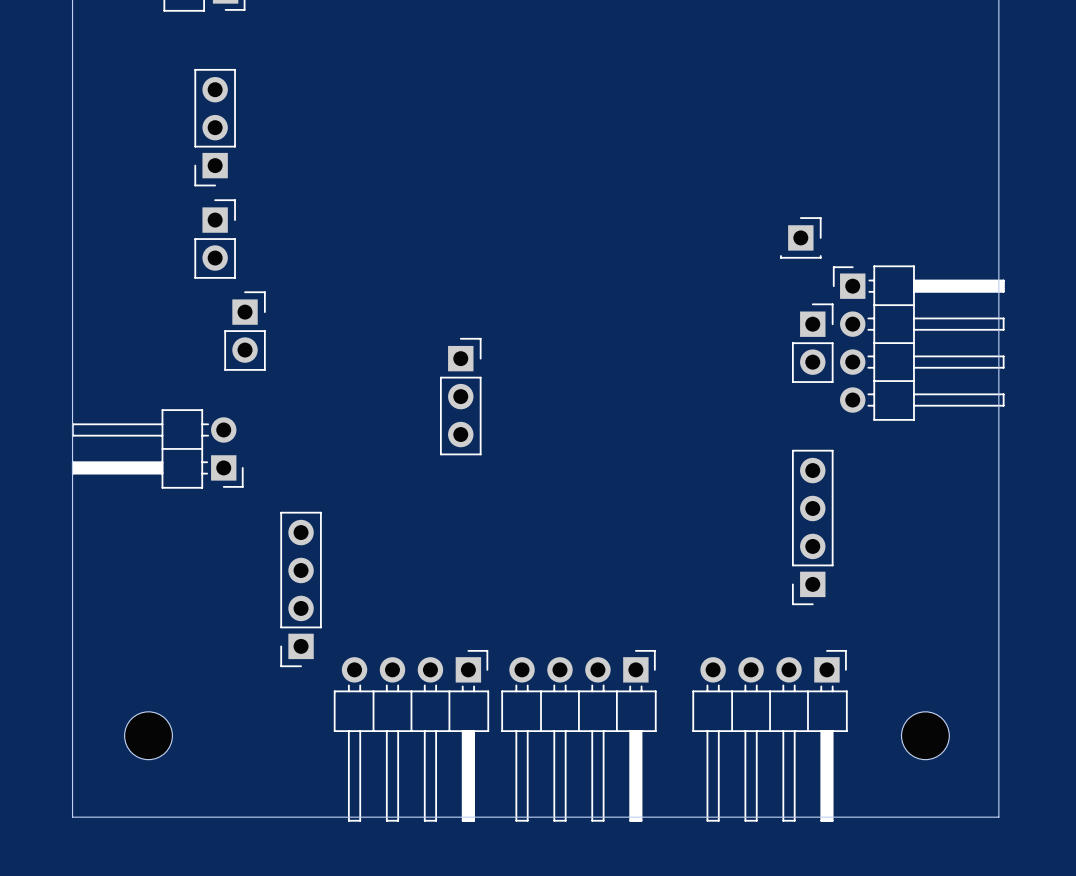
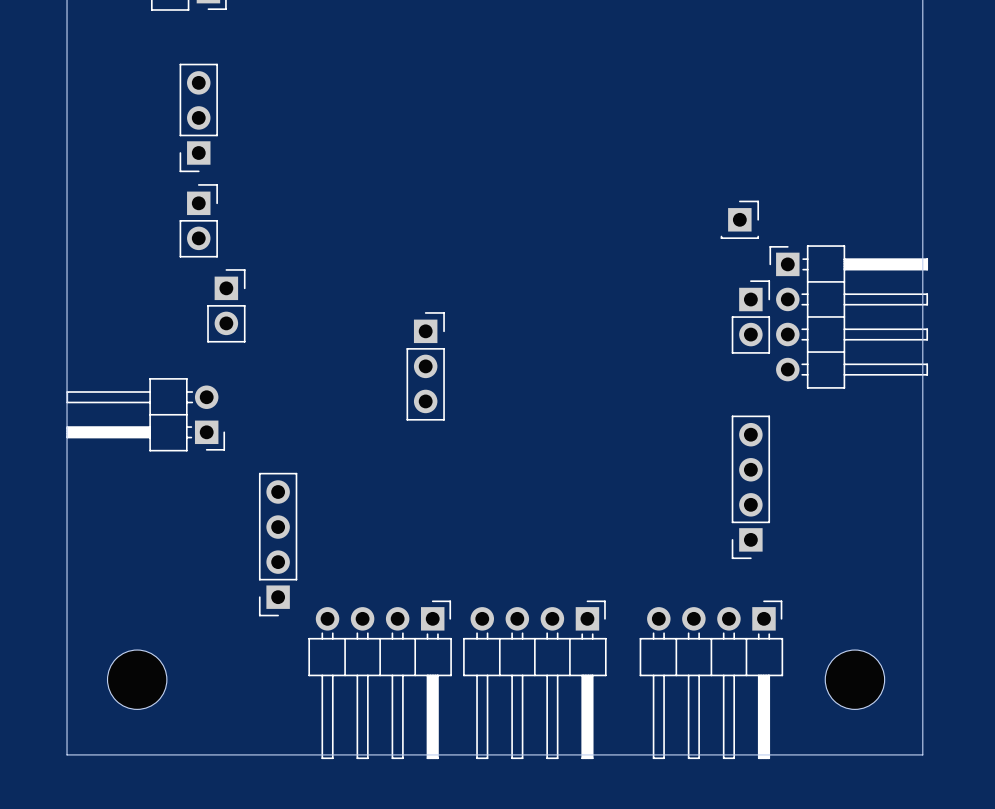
part footprint: [124, 711, 173, 760] -> [107, 650, 167, 710]
part footprint: [901, 711, 950, 760] -> [825, 650, 885, 710]

